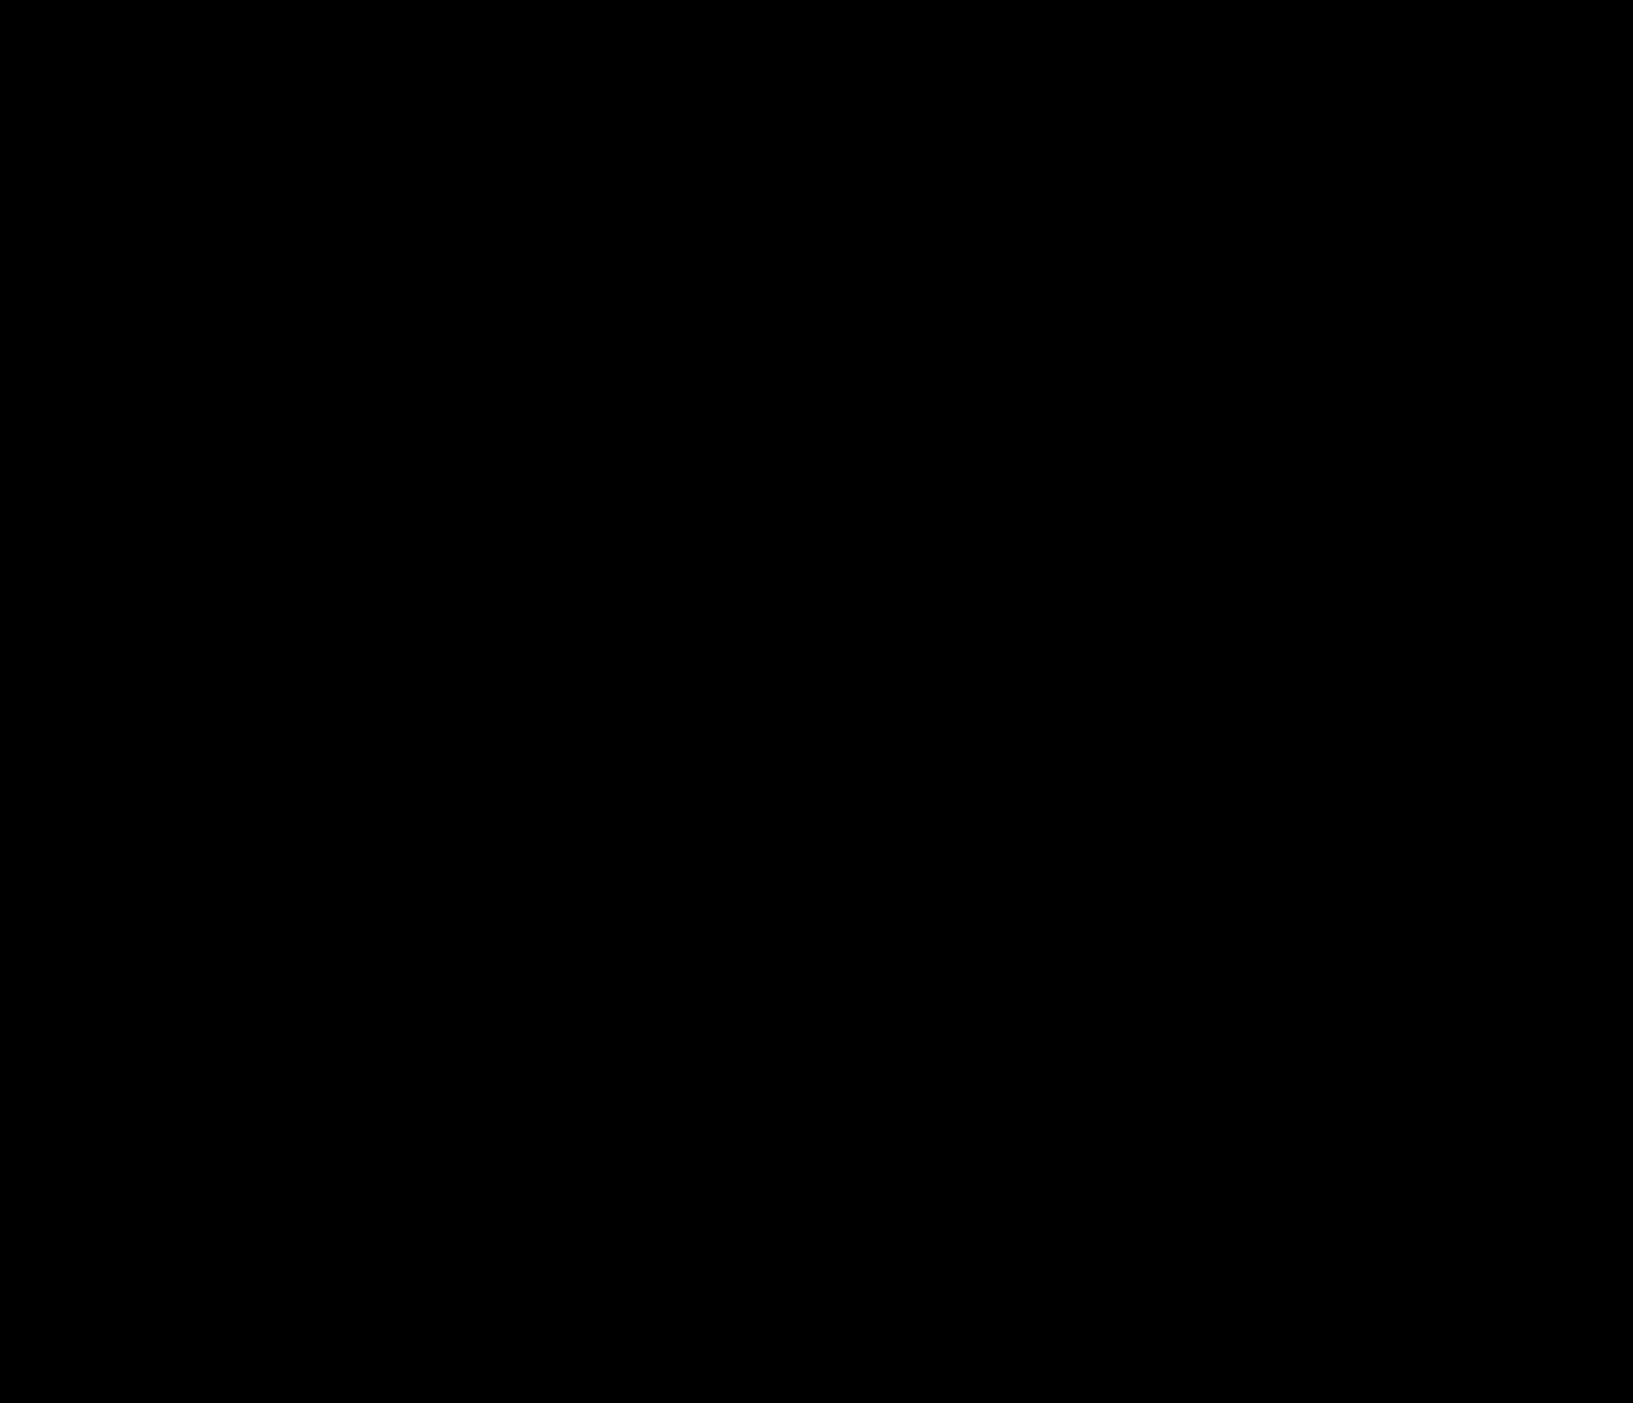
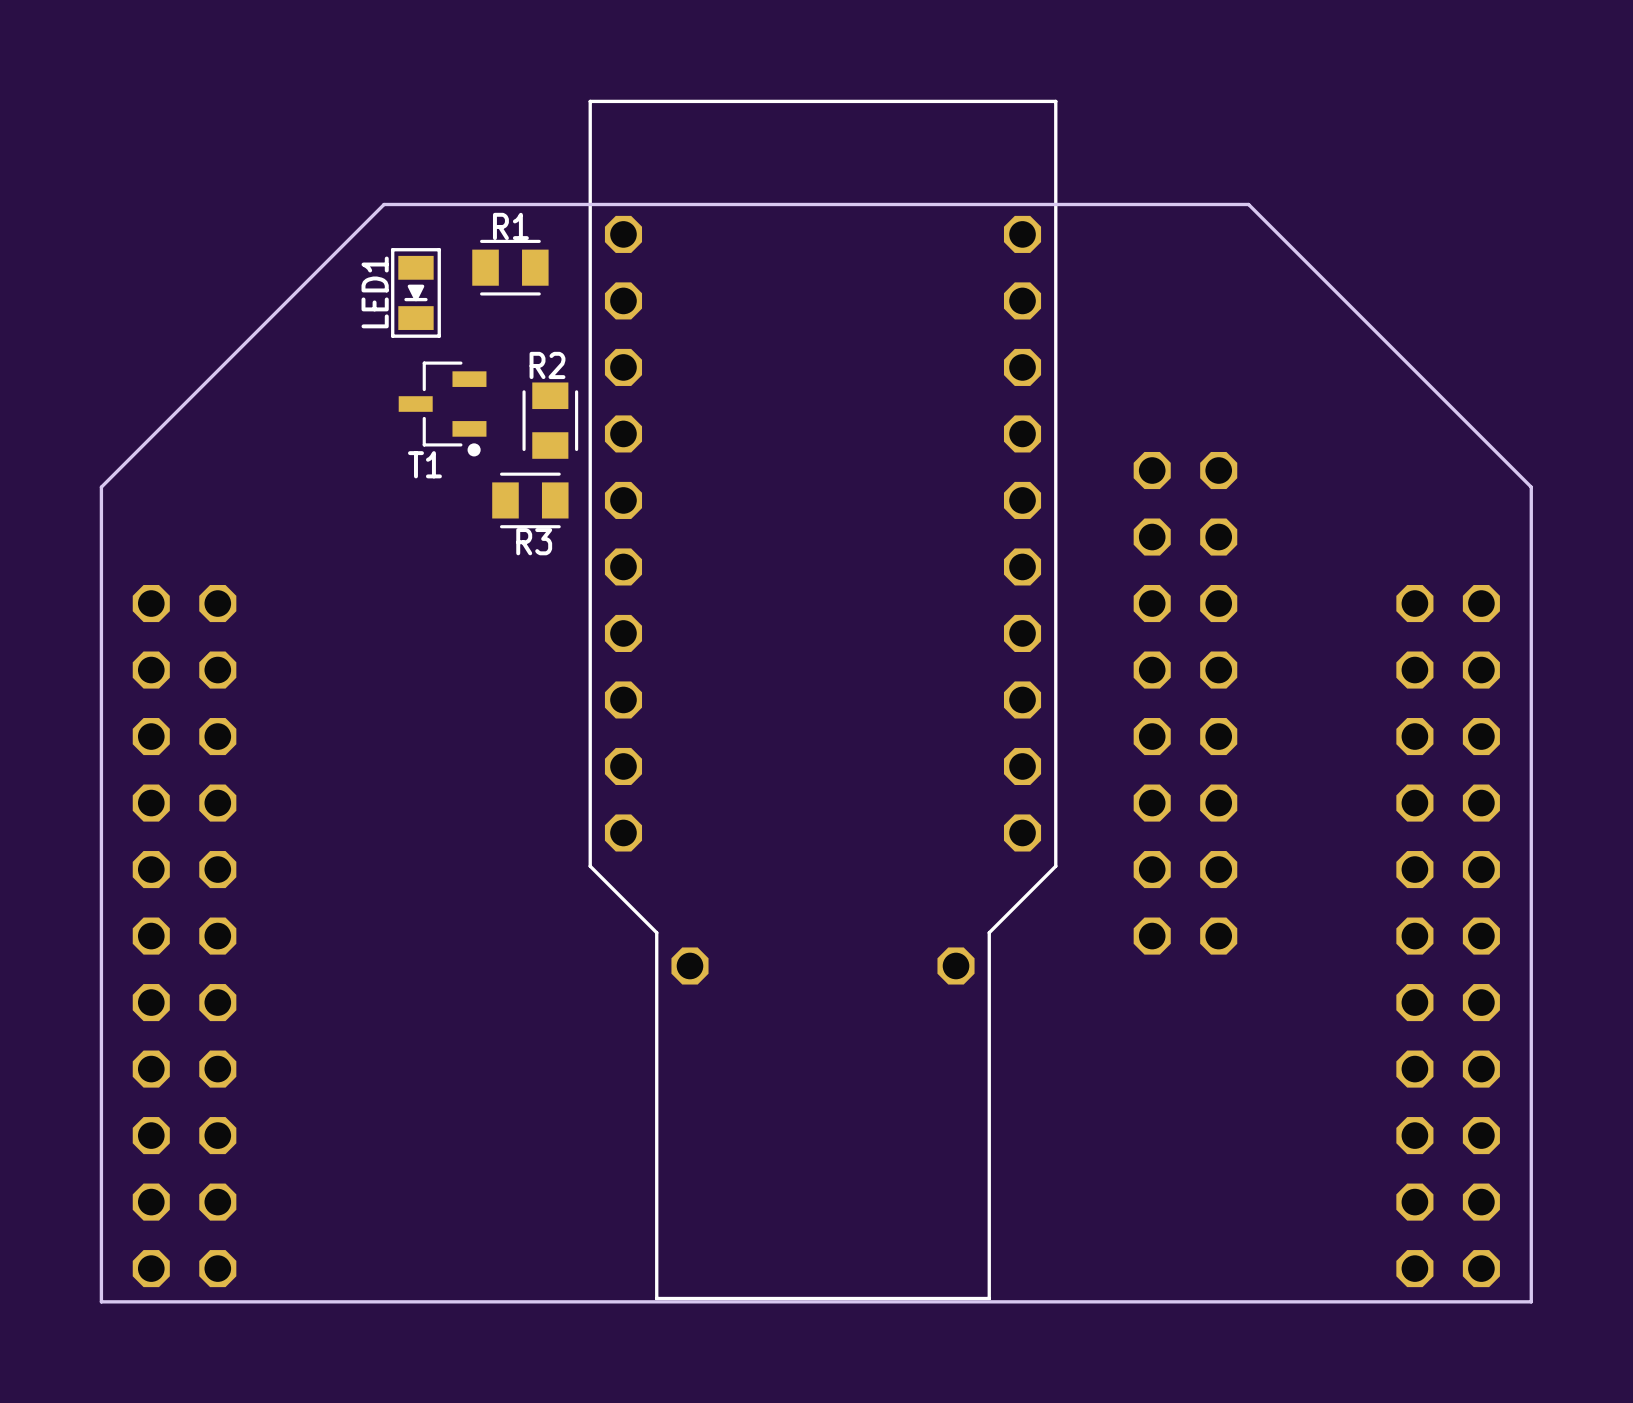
R1: none -> (510, 267)
LED1: none -> (415, 292)
T1: none -> (442, 408)
R2: none -> (550, 420)
R3: none -> (530, 500)
part: none -> (823, 699)
part: none -> (816, 753)

